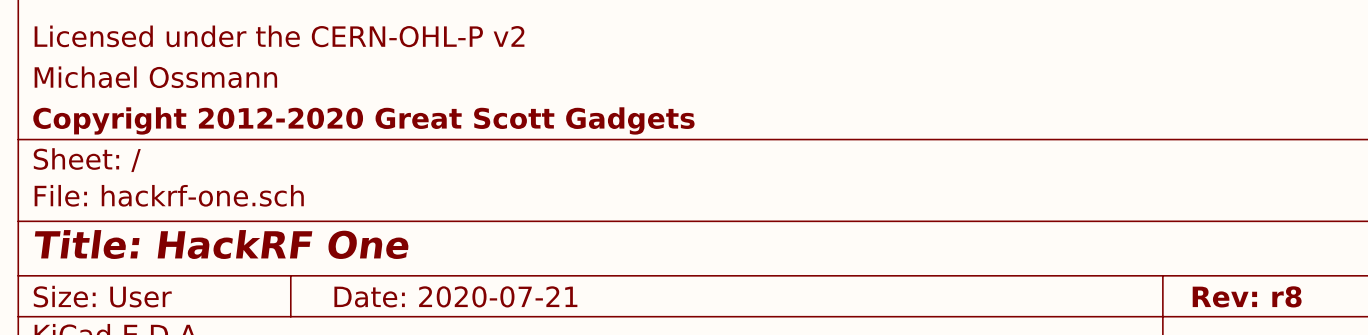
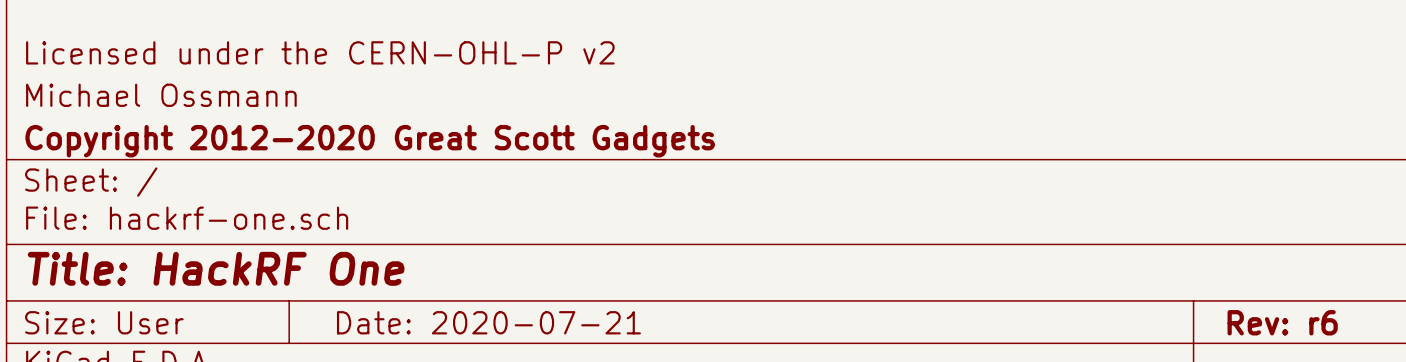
title block: Rev: r8 (1247, 296) -> Rev: r6 (1282, 322)

